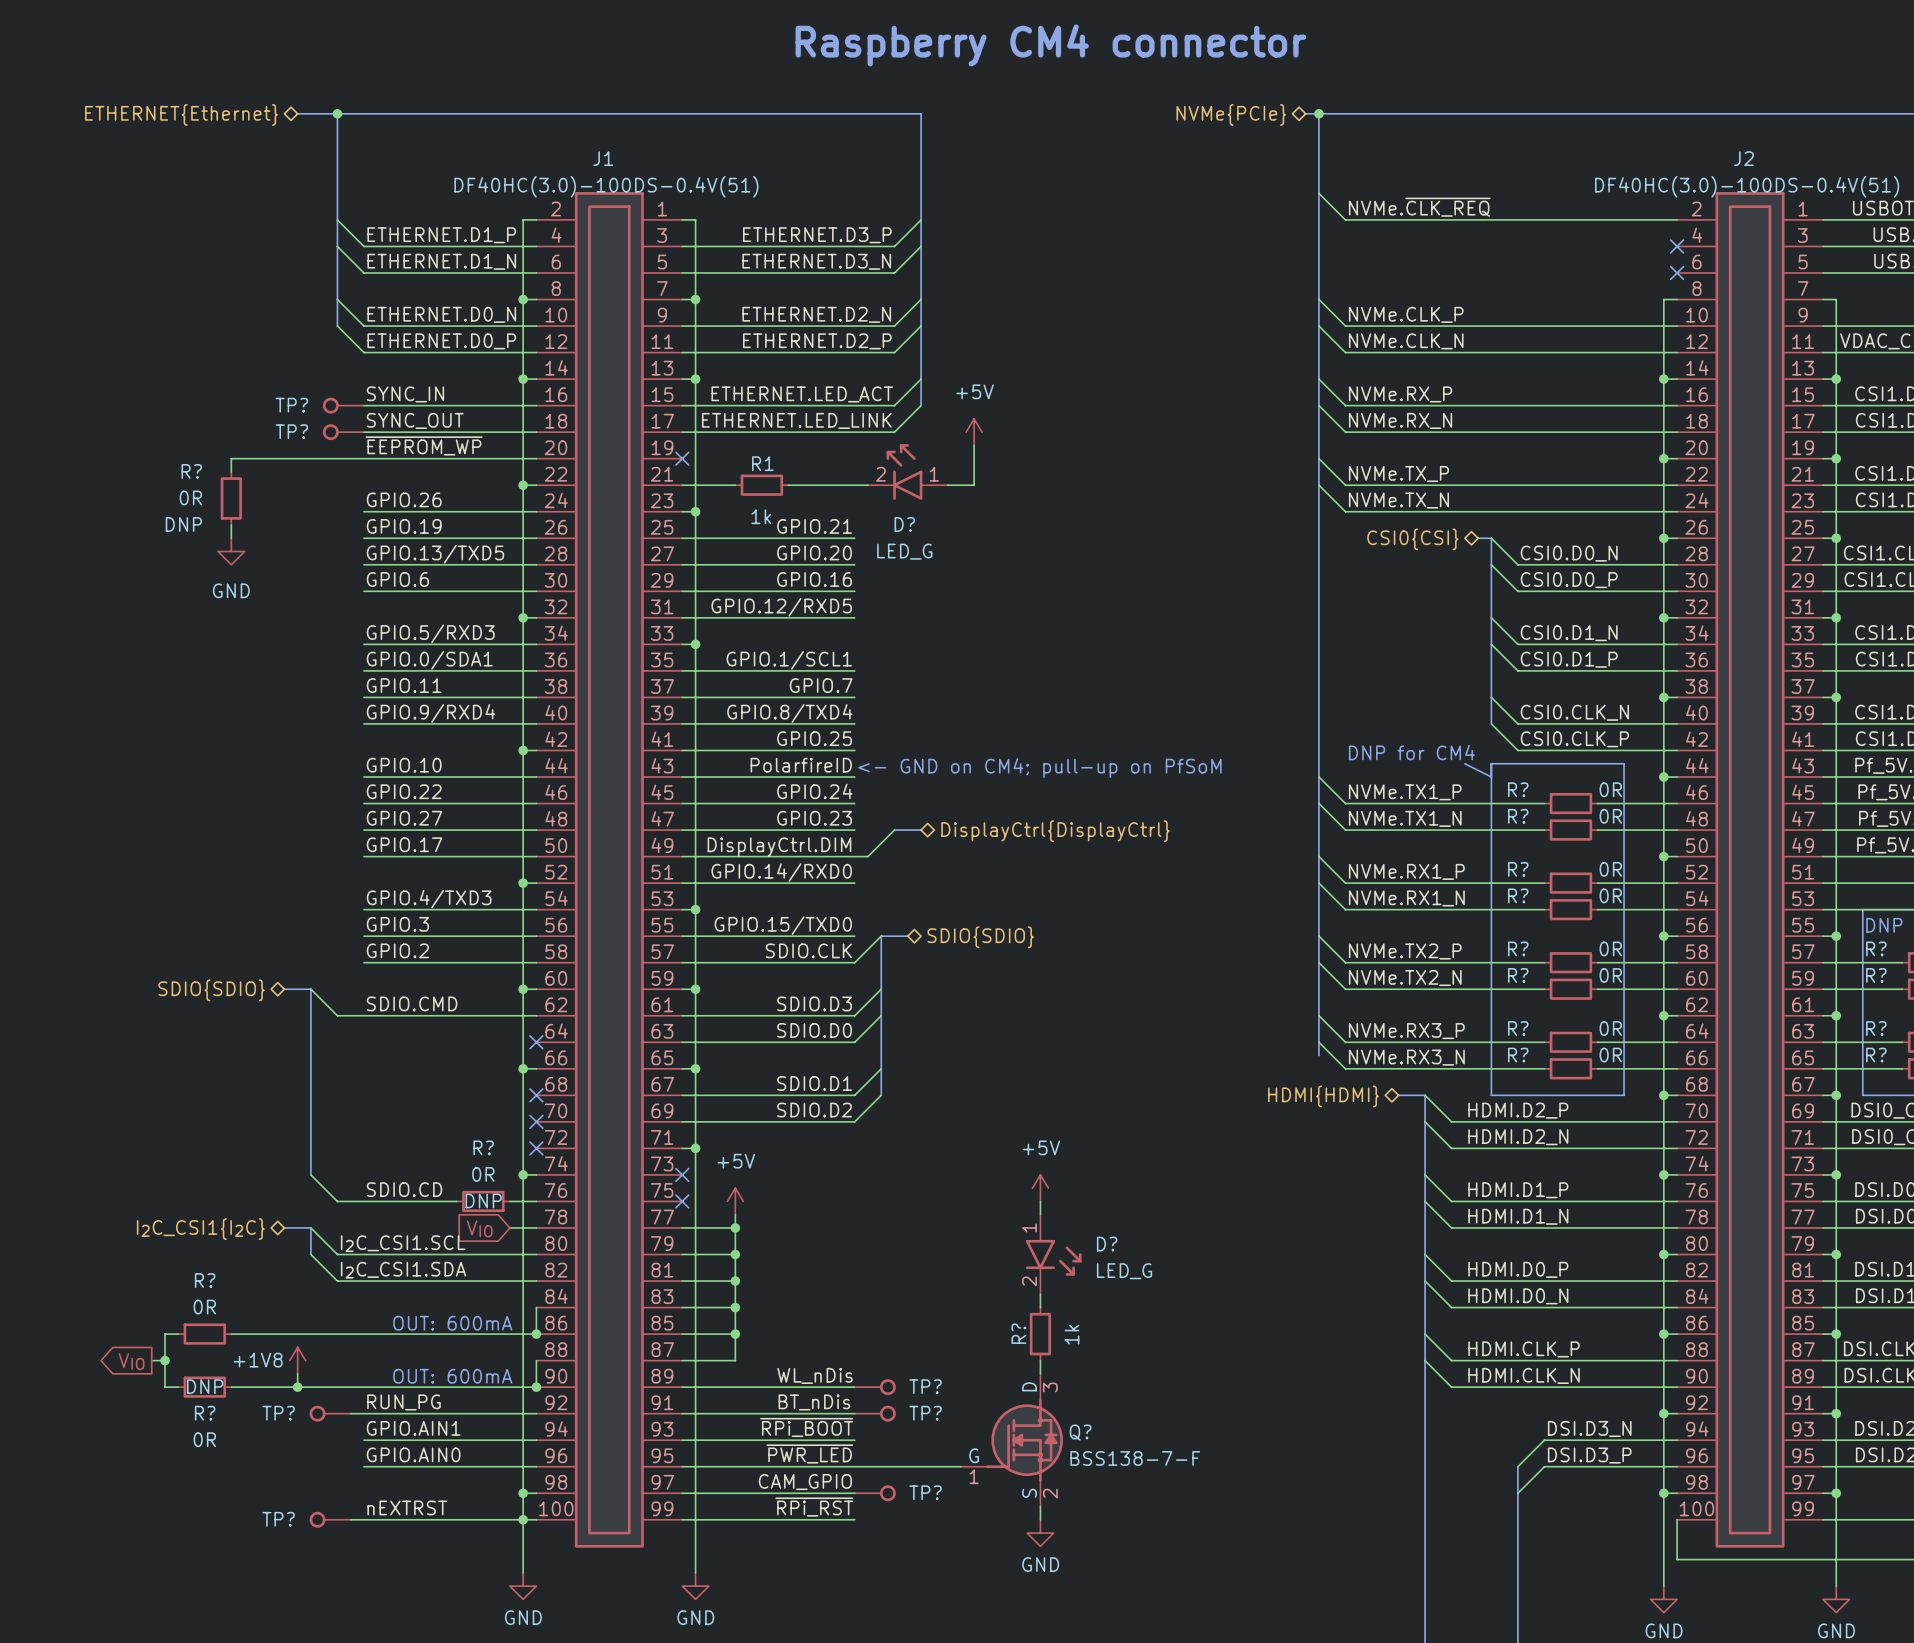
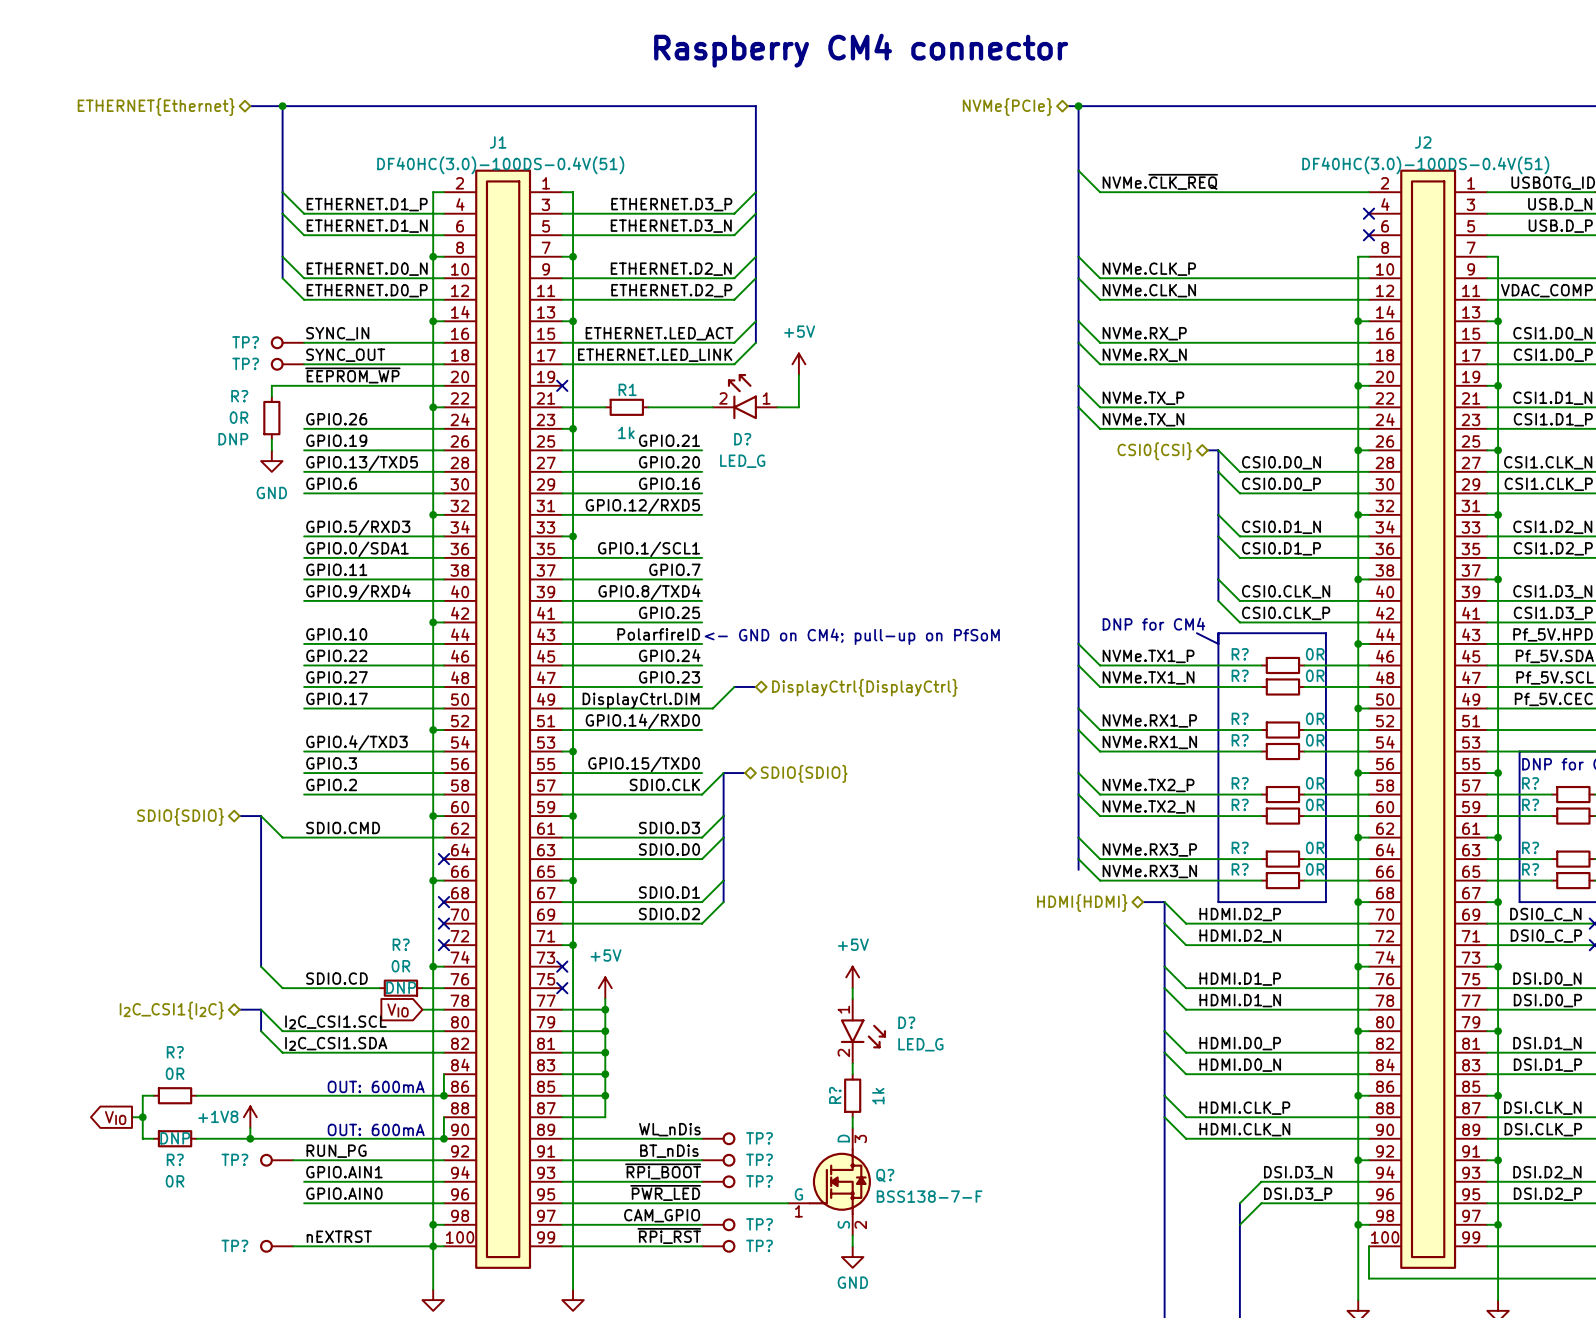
wire: (324, 458) (231, 458) (231, 471) -> (271, 385) (271, 396)
R? position: (231, 498) -> (271, 418)
wire: (231, 525) (231, 538) -> (271, 439) (271, 450)
power symbol position: GND (231, 551) -> GND (271, 461)
TP?: none -> (718, 1181)
TP?: none -> (718, 1246)

